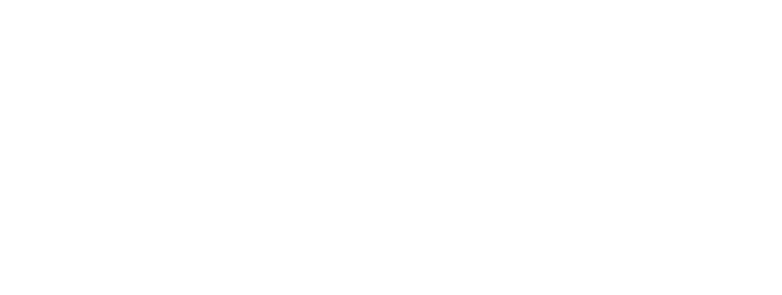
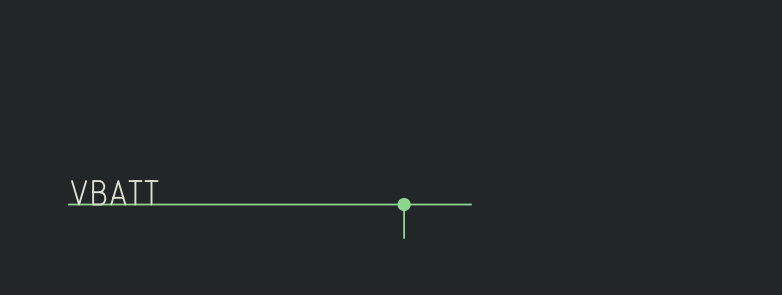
label: none -> VBATT (114, 192)
wire: none -> (68, 204) (471, 204)
wire: none -> (404, 204) (404, 238)
junction: none -> (404, 204)

